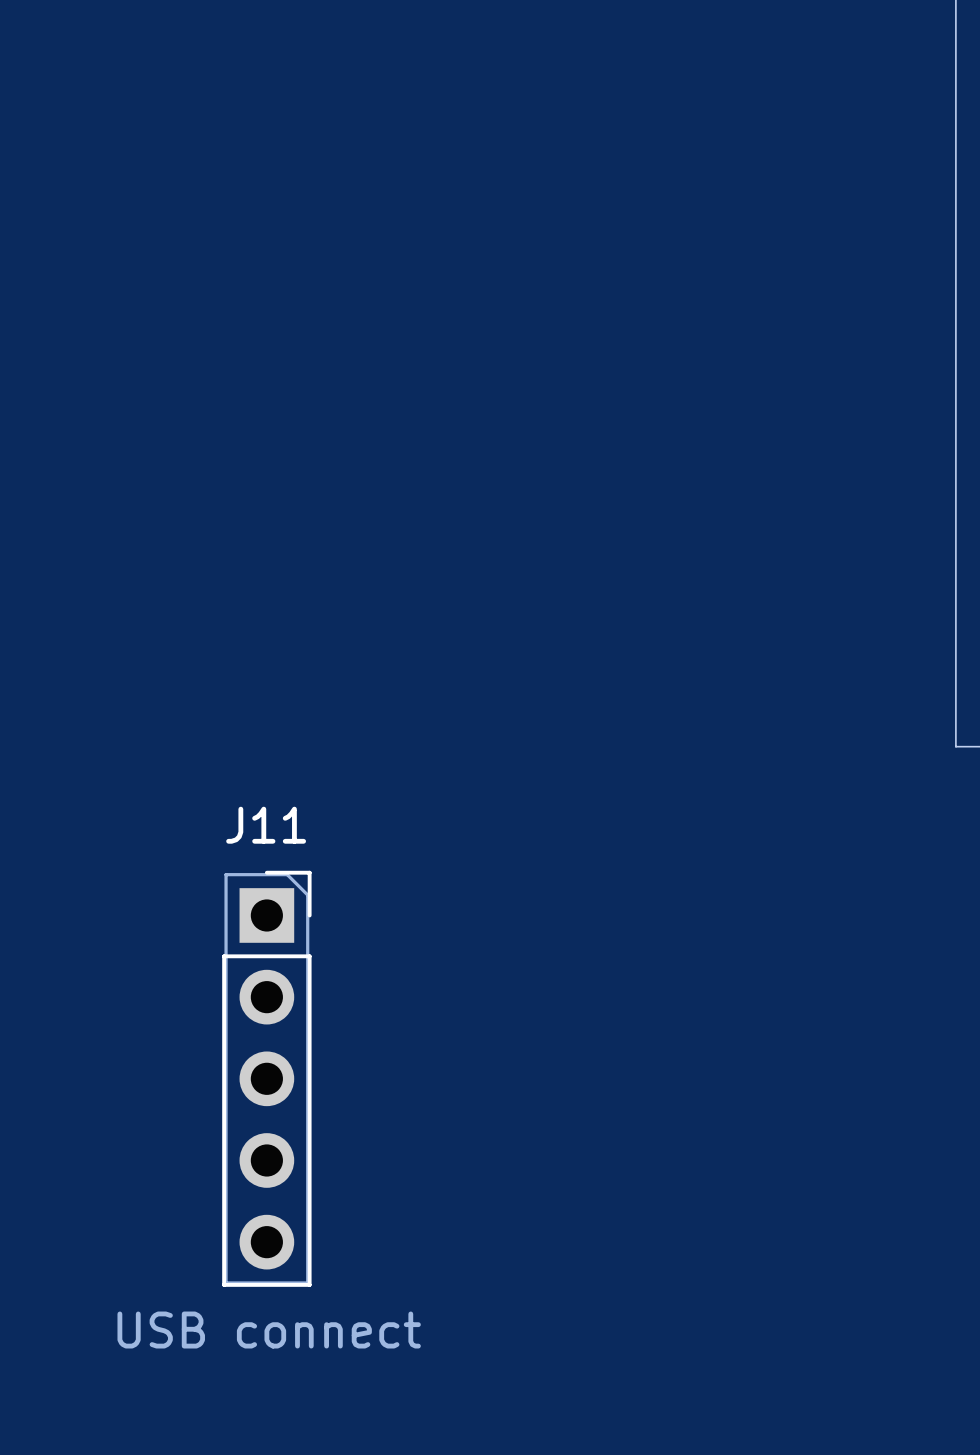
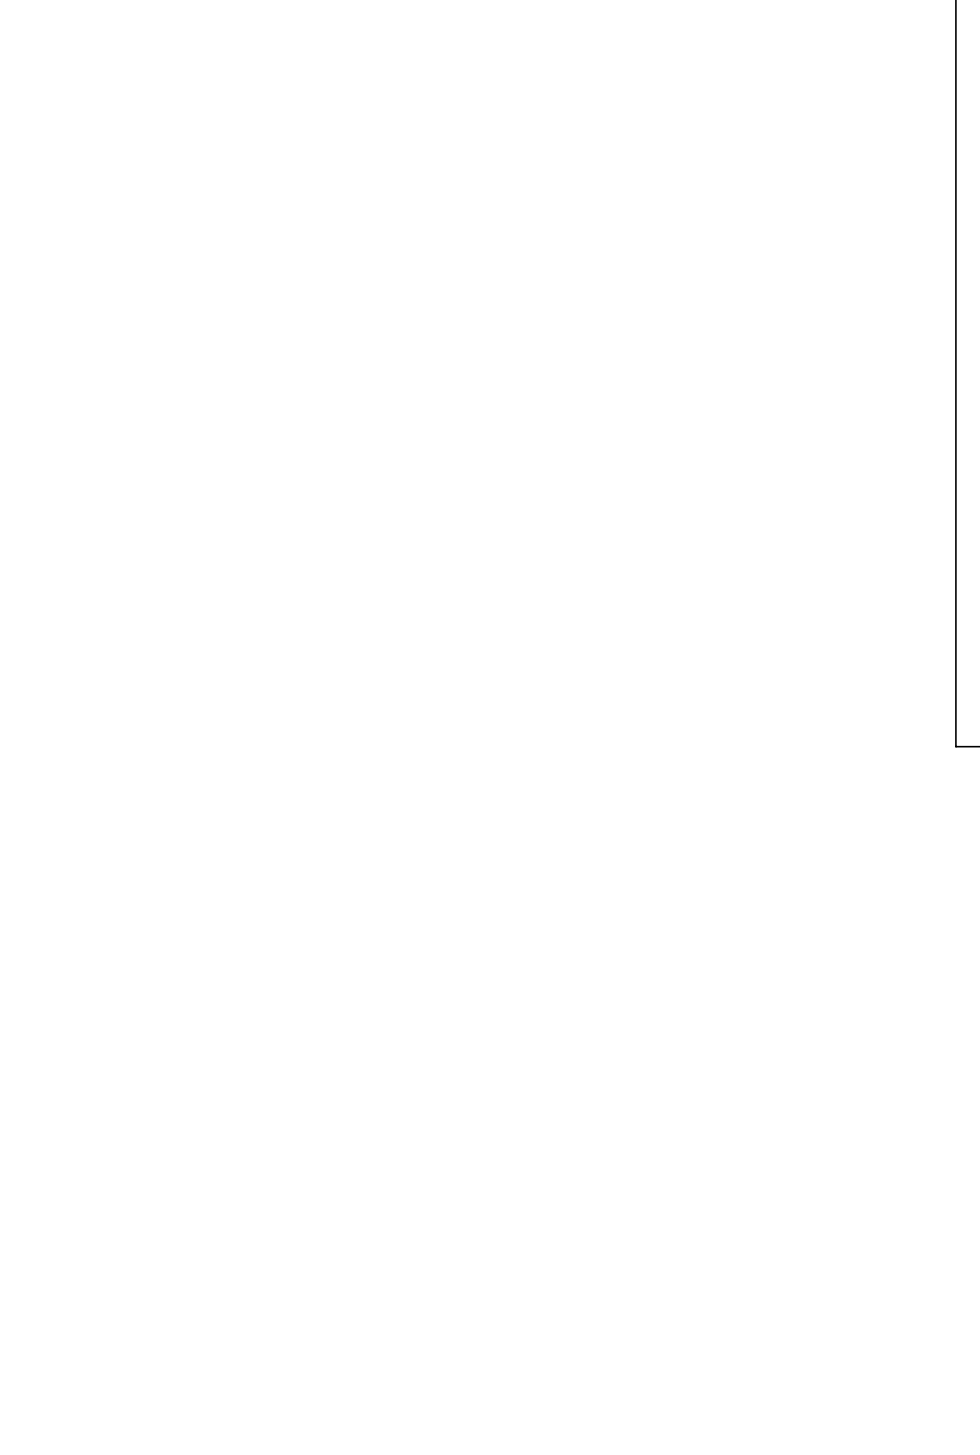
J11: USB connect (266, 1078) -> none

